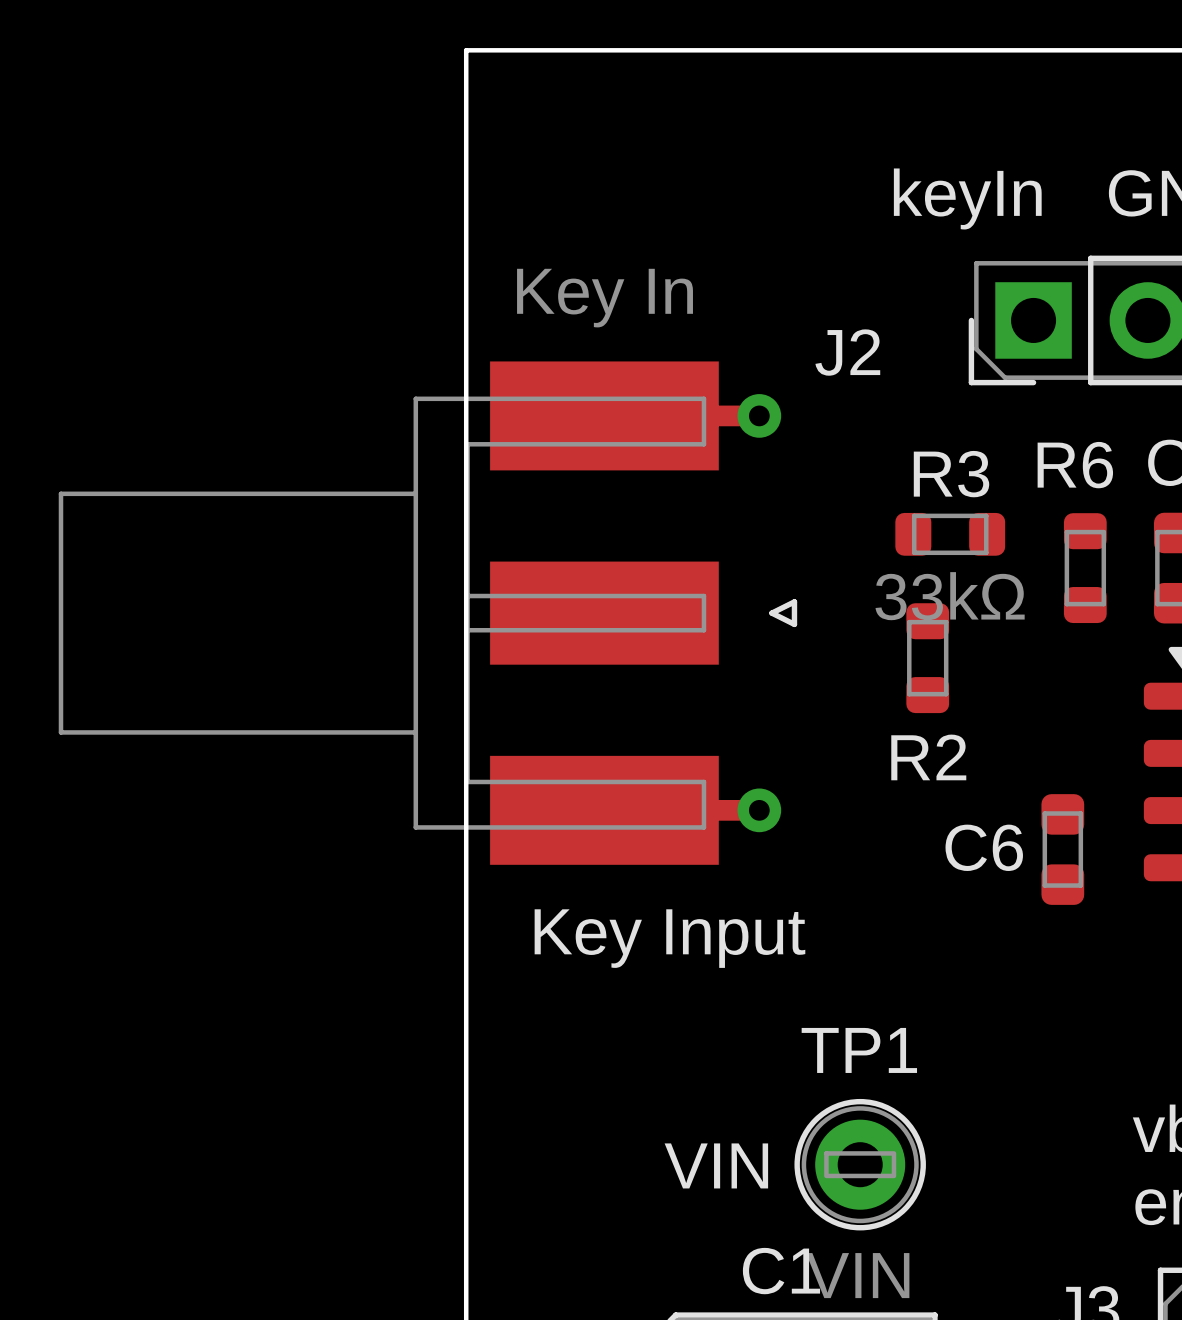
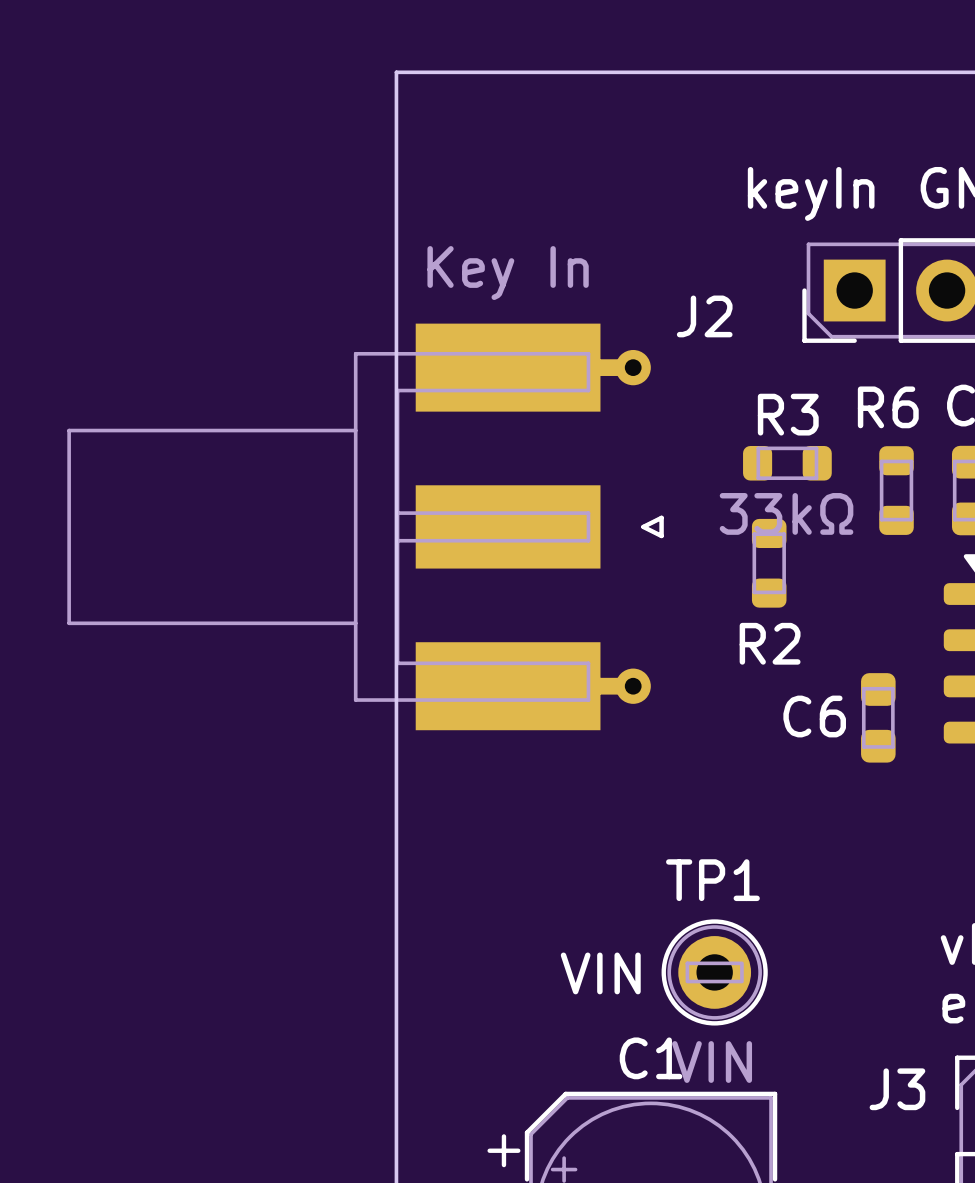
text: Key Input (669, 938) -> none

